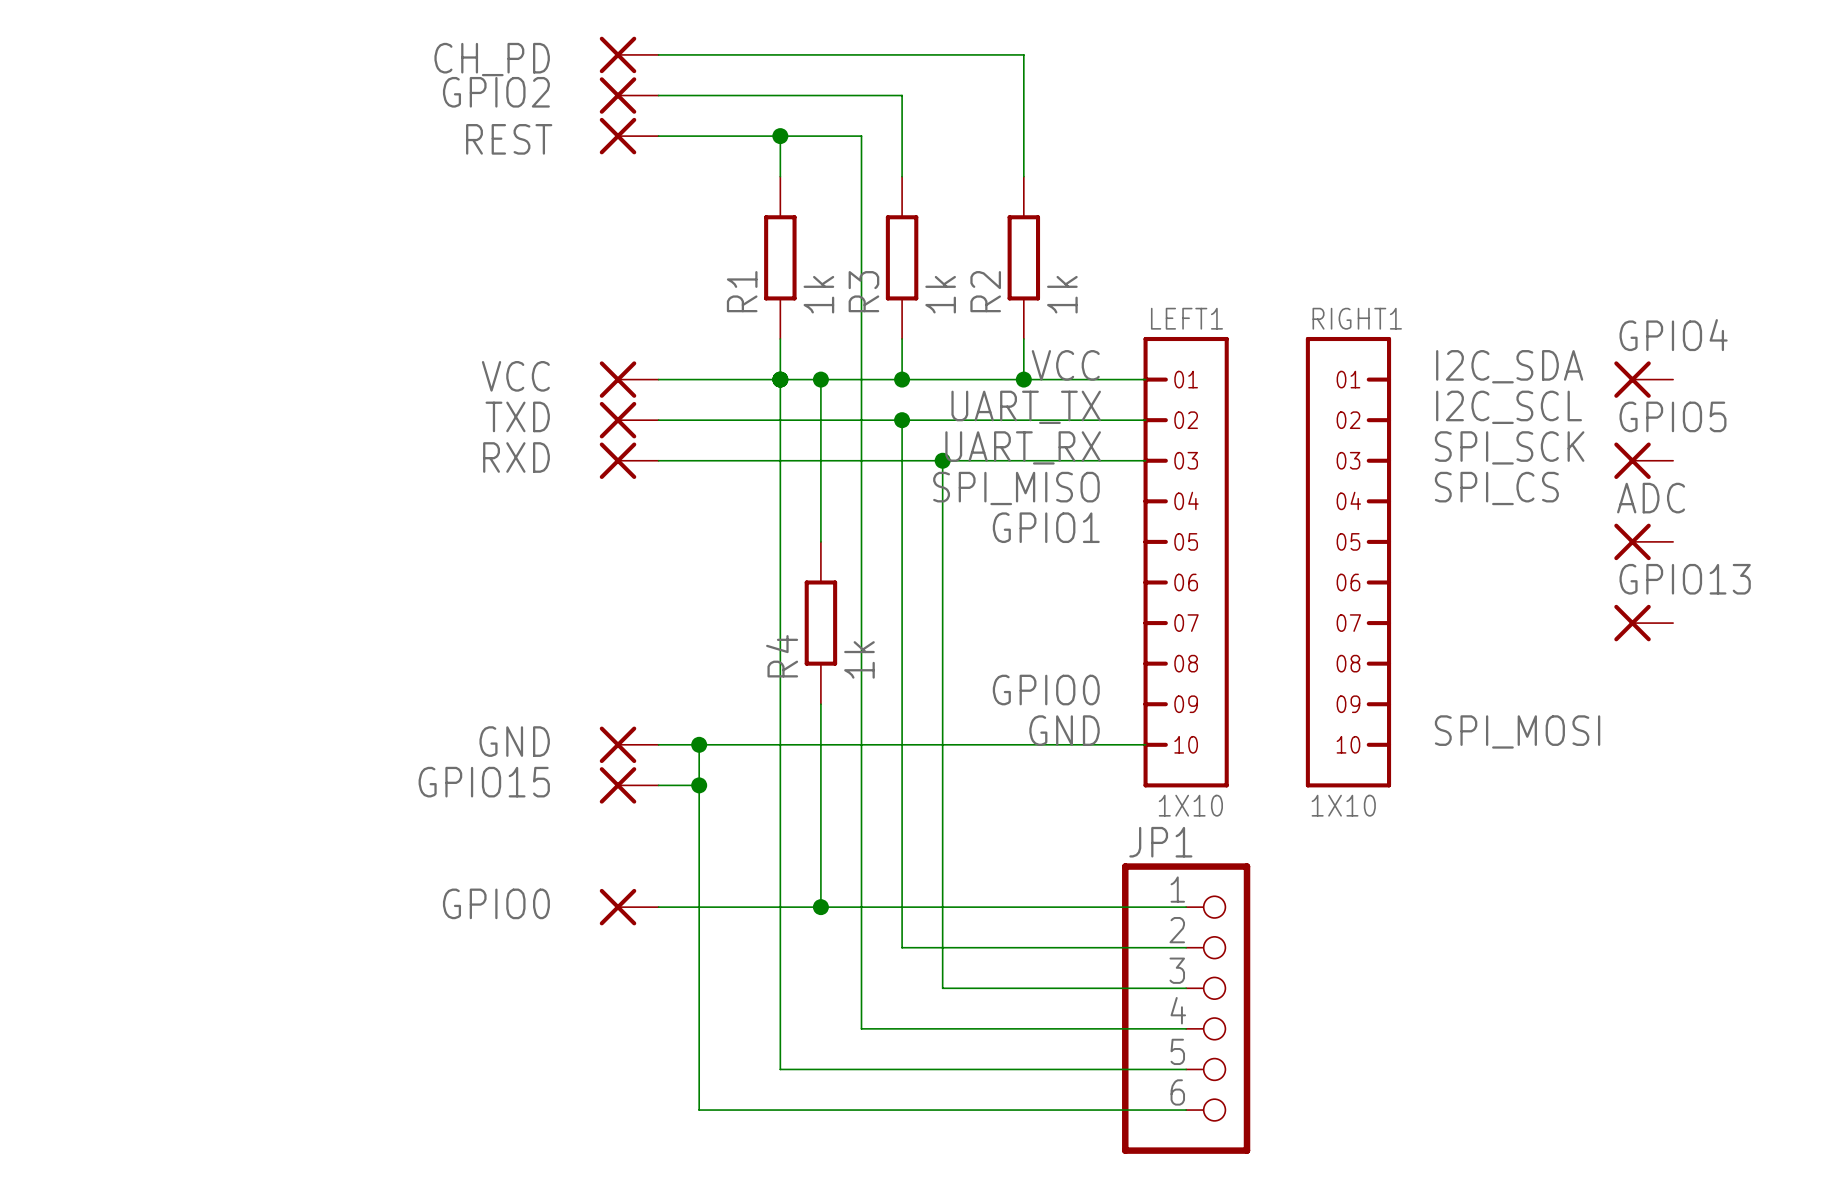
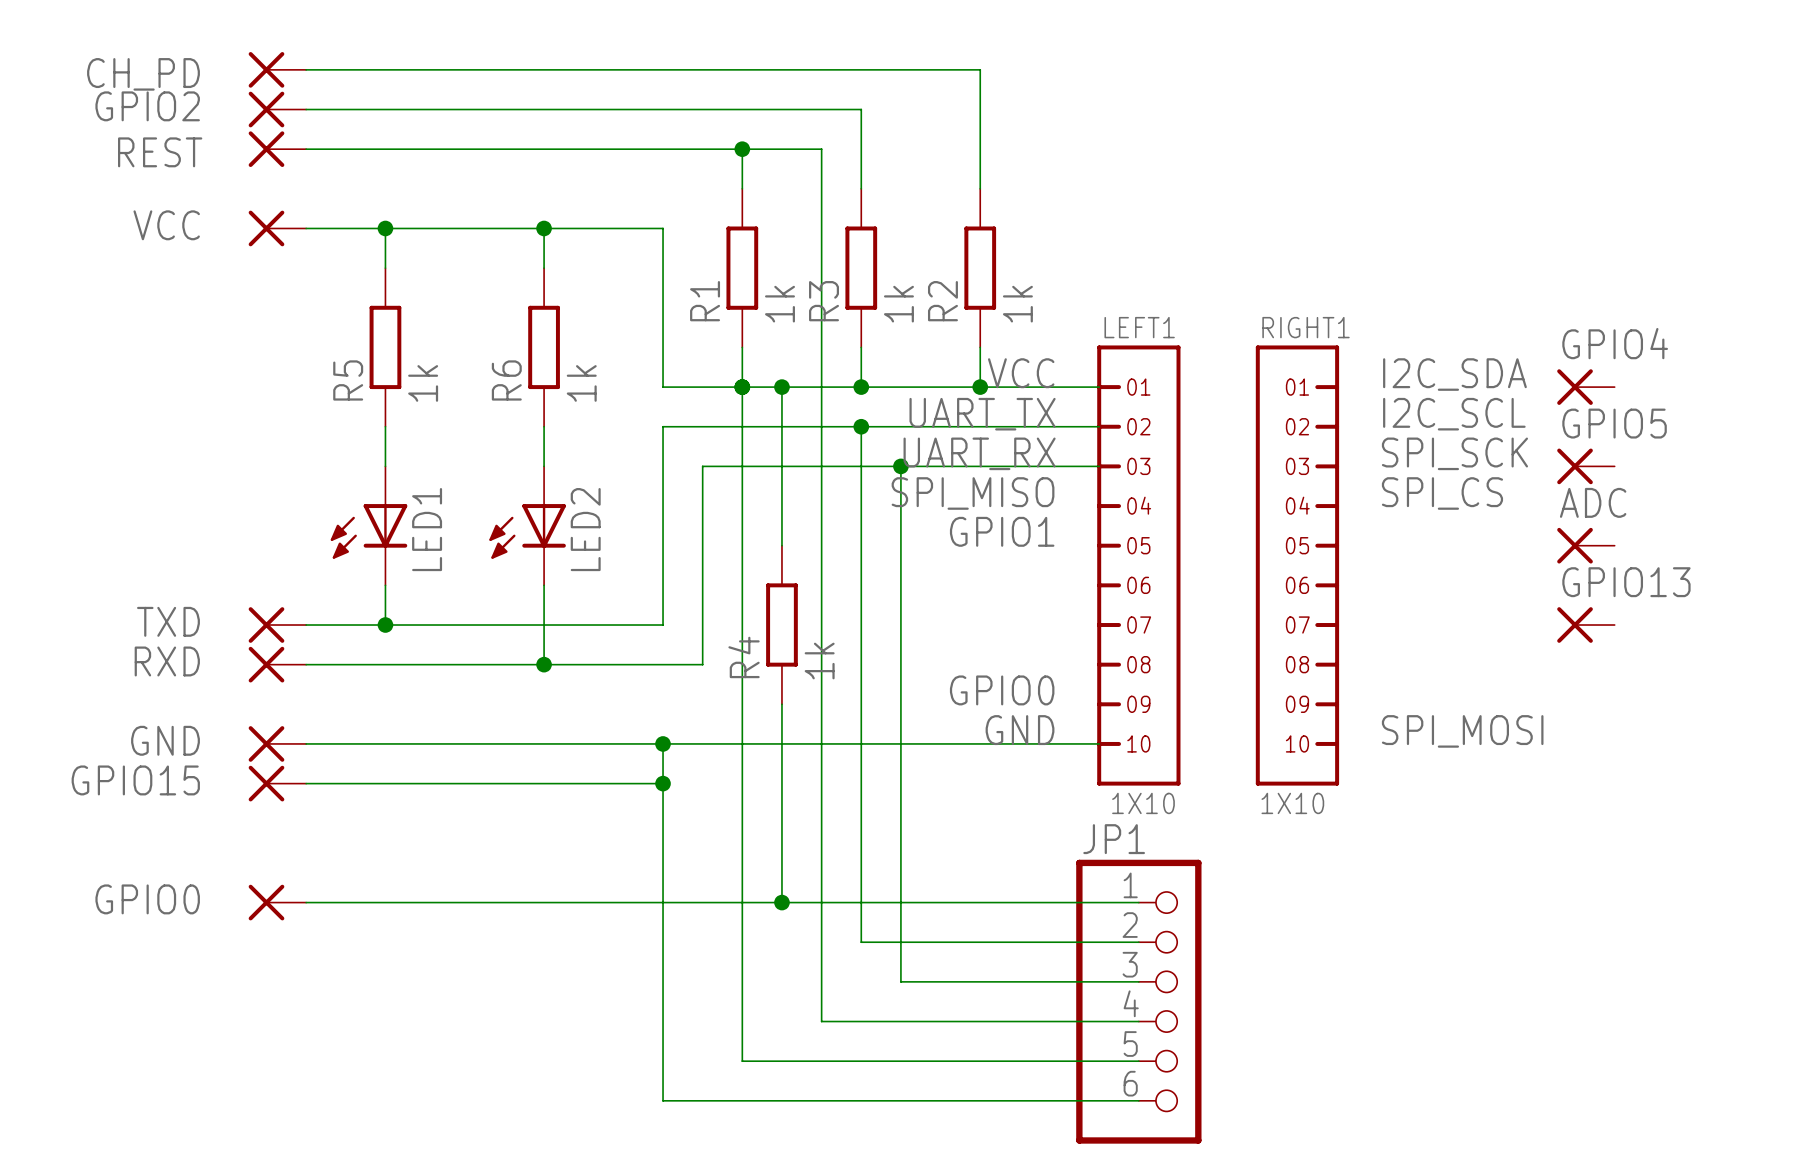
wire: none -> (306, 69) (623, 69)
CH_PD position: (629, 54) -> (277, 69)
wire: none -> (306, 109) (623, 109)
GPIO2 position: (629, 95) -> (277, 109)
wire: none -> (306, 149) (623, 149)
REST position: (629, 136) -> (277, 149)
wire: none -> (385, 228) (385, 268)
junction: none -> (385, 228)
wire: none -> (544, 228) (544, 268)
junction: none -> (544, 228)
R5: none -> 1k (385, 347)
R6: none -> 1k (544, 347)
VCC position: (629, 379) -> (277, 228)
wire: (658, 379) (699, 379) -> (306, 228) (663, 228) (663, 387)
wire: none -> (385, 426) (385, 466)
wire: none -> (544, 426) (544, 466)
TXD position: (629, 420) -> (277, 625)
wire: (658, 420) (699, 420) -> (306, 625) (663, 625) (663, 426)
RXD position: (629, 460) -> (277, 664)
wire: (658, 460) (739, 460) -> (306, 664) (702, 664) (702, 466)
LED1: none -> (369, 525)
LED2: none -> (527, 525)
wire: none -> (385, 585) (385, 625)
wire: none -> (544, 585) (544, 664)
junction: none -> (385, 625)
junction: none -> (544, 664)
wire: none -> (306, 743) (623, 743)
GND position: (629, 744) -> (277, 743)
wire: none -> (306, 783) (623, 783)
GPIO15 position: (629, 785) -> (277, 783)
wire: none -> (306, 902) (623, 902)
GPIO0 position: (629, 907) -> (277, 902)

